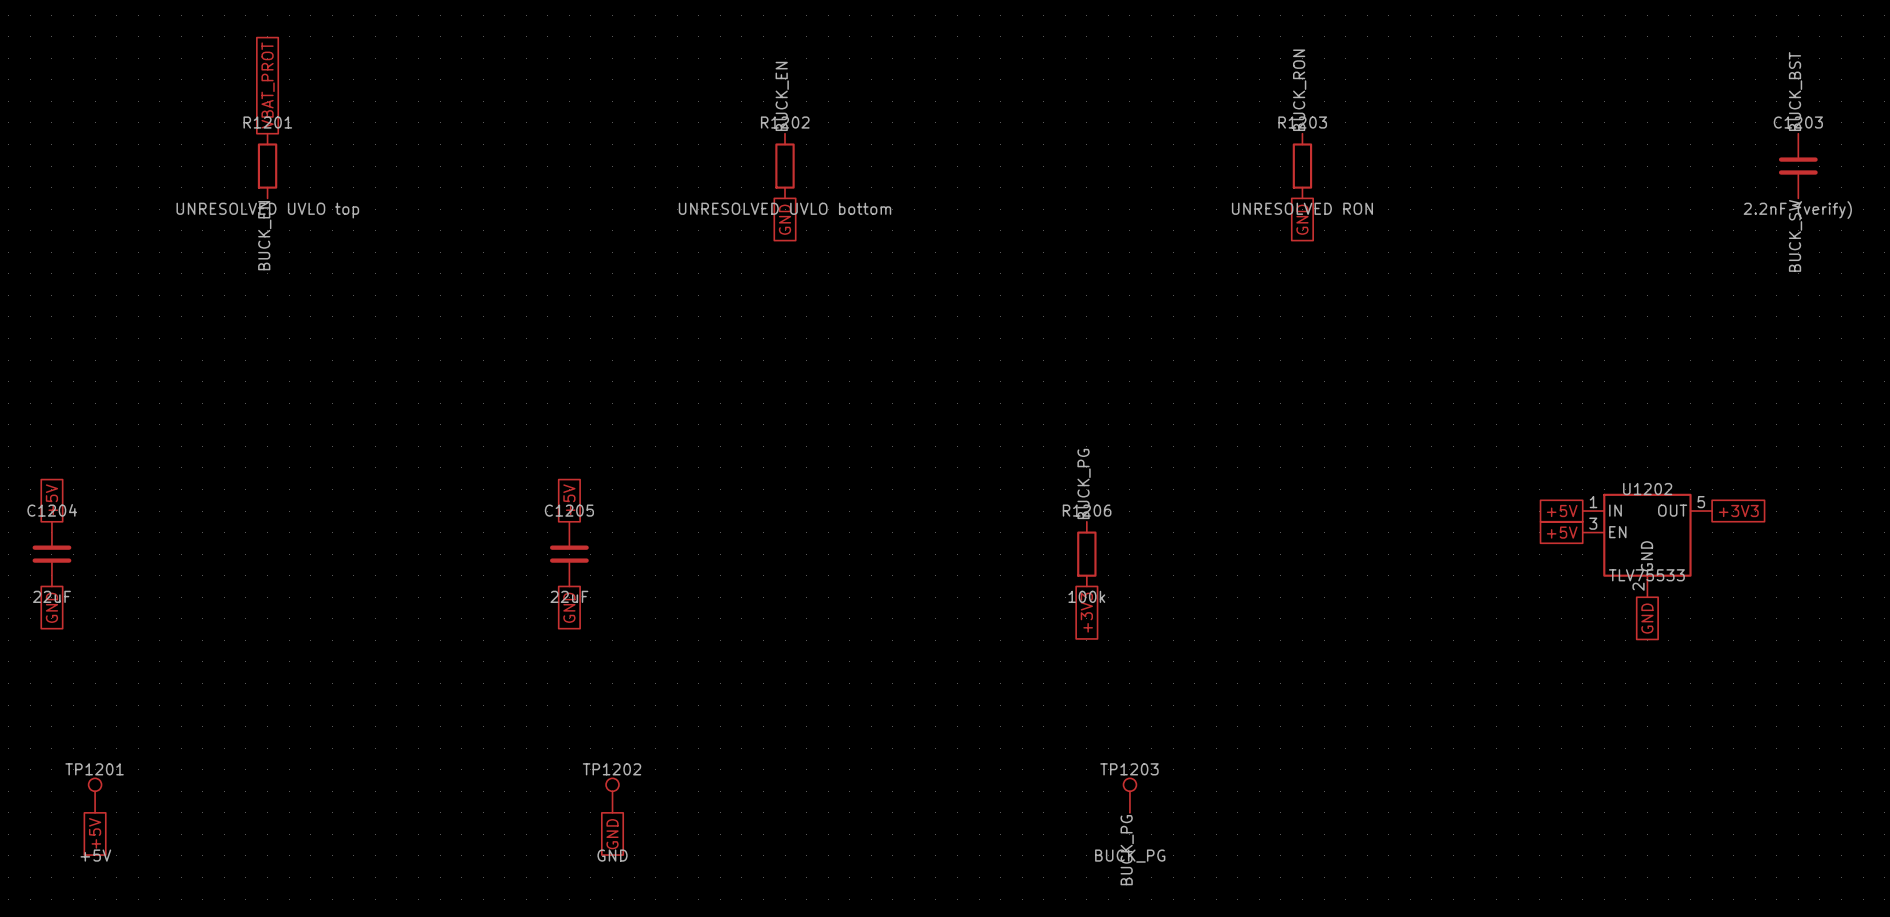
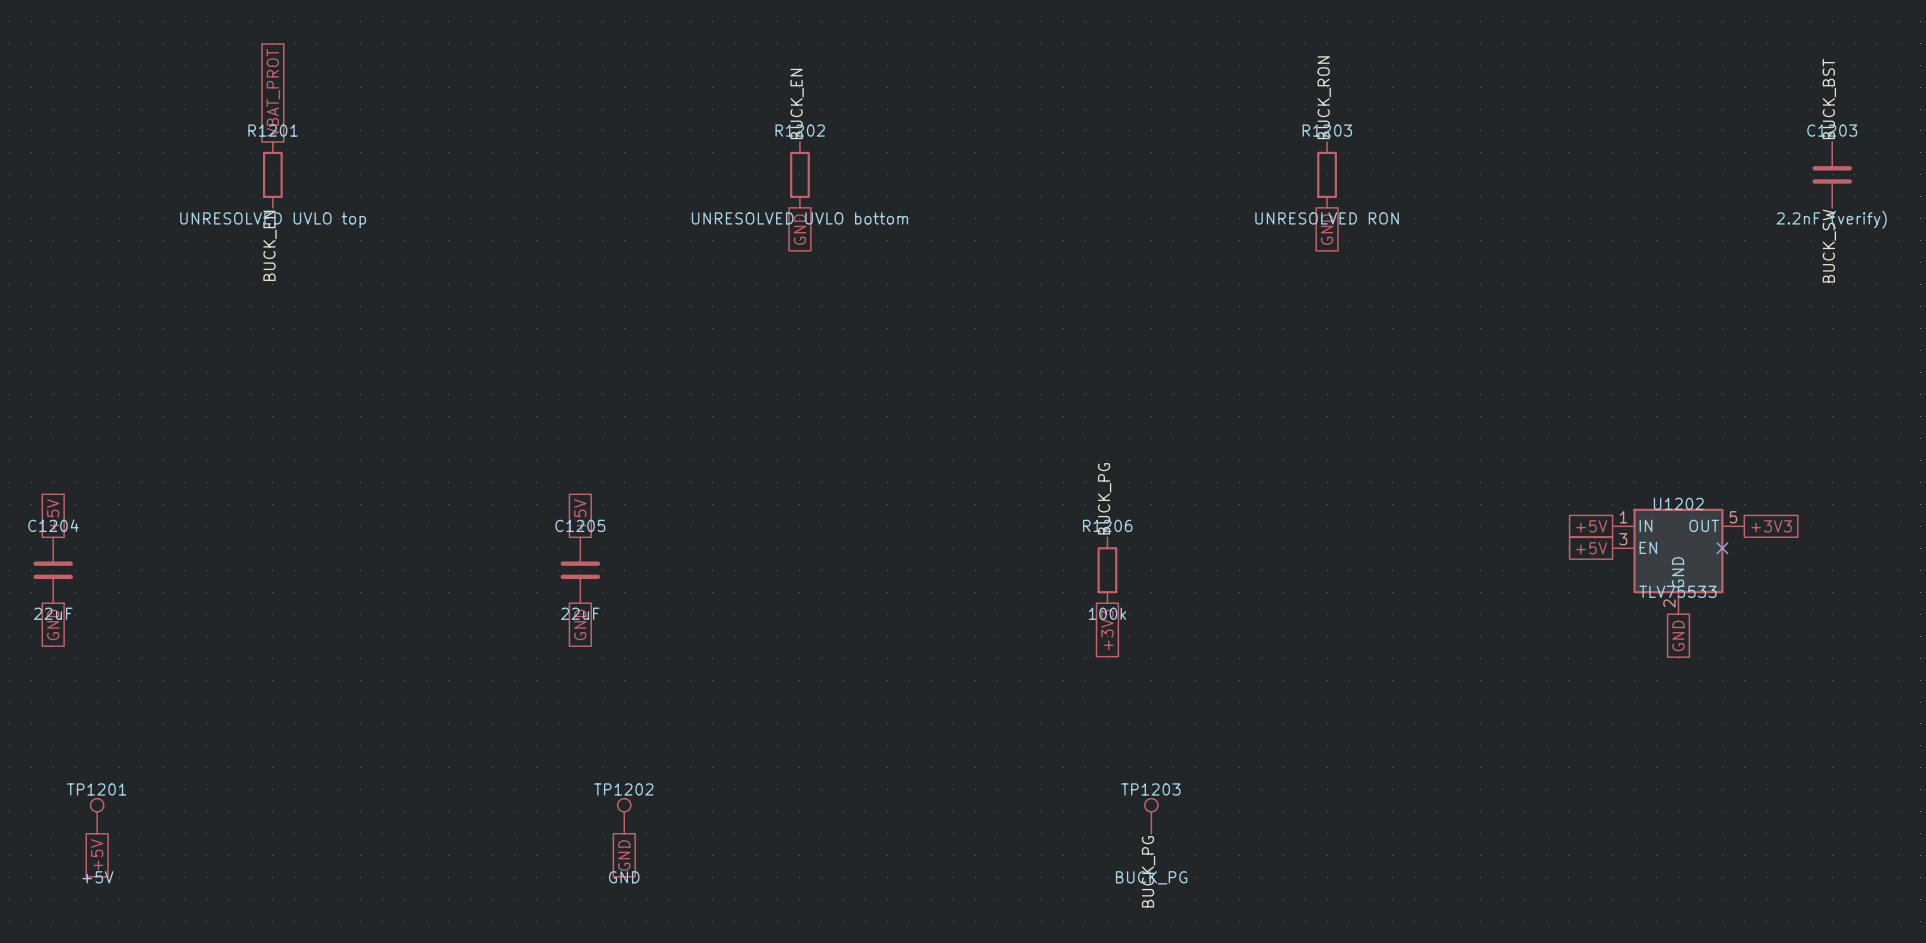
no-connect mark: none -> (1722, 548)

